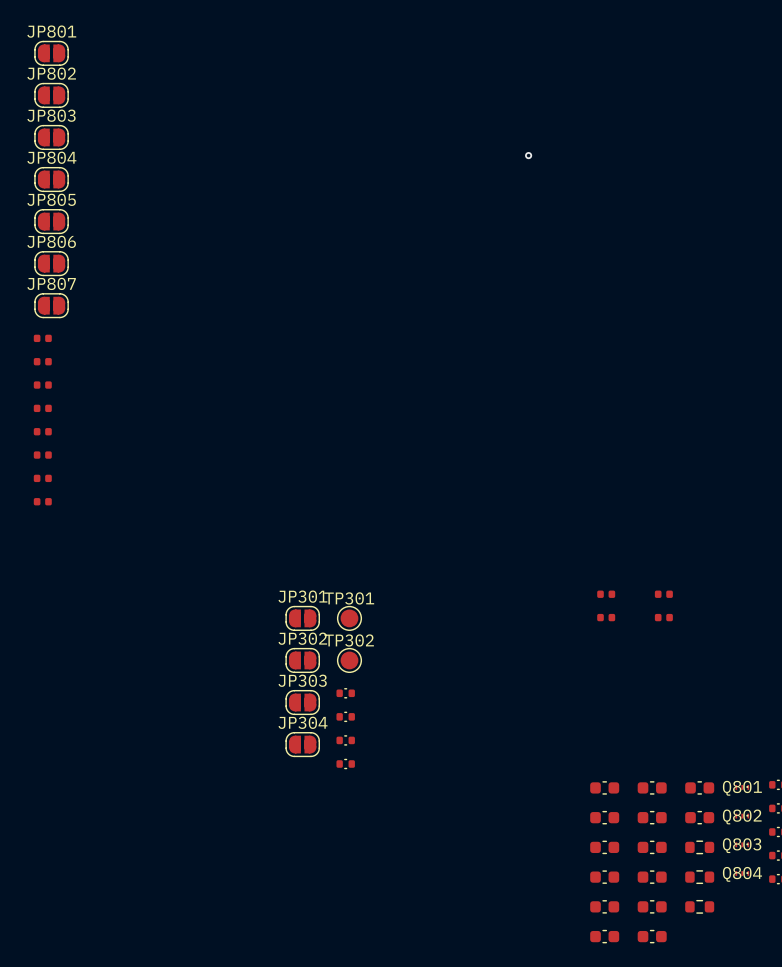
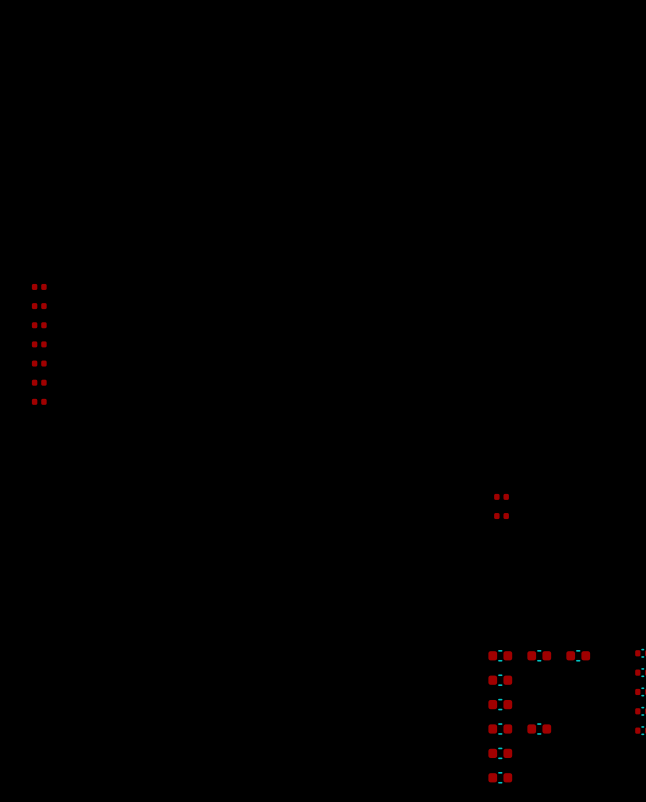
JP801: (51, 53) -> none
JP802: (51, 95) -> none
JP803: (51, 137) -> none
via: (528, 155) -> none
JP804: (51, 179) -> none
JP805: (51, 221) -> none
JP806: (51, 263) -> none
JP807: (51, 305) -> none
part: (42, 501) -> none
part: (663, 594) -> none
part: (663, 617) -> none
JP301: (302, 618) -> none
TP301: (349, 618) -> none
JP302: (302, 660) -> none
TP302: (349, 660) -> none
part: (345, 693) -> none
JP303: (302, 702) -> none
part: (345, 716) -> none
part: (345, 740) -> none
JP304: (302, 744) -> none
part: (345, 763) -> none
Q801: (742, 787) -> none
Q802: (742, 816) -> none
part: (652, 817) -> none
part: (699, 817) -> none
Q803: (742, 844) -> none
part: (652, 847) -> none
part: (699, 847) -> none
Q804: (742, 873) -> none
part: (699, 877) -> none
part: (652, 906) -> none
part: (699, 906) -> none
part: (652, 936) -> none

